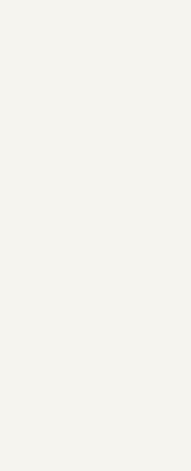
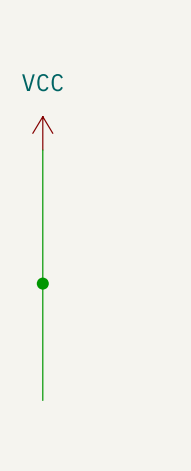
power symbol: none -> VCC (42, 133)
wire: none -> (42, 150) (42, 400)
junction: none -> (42, 283)

